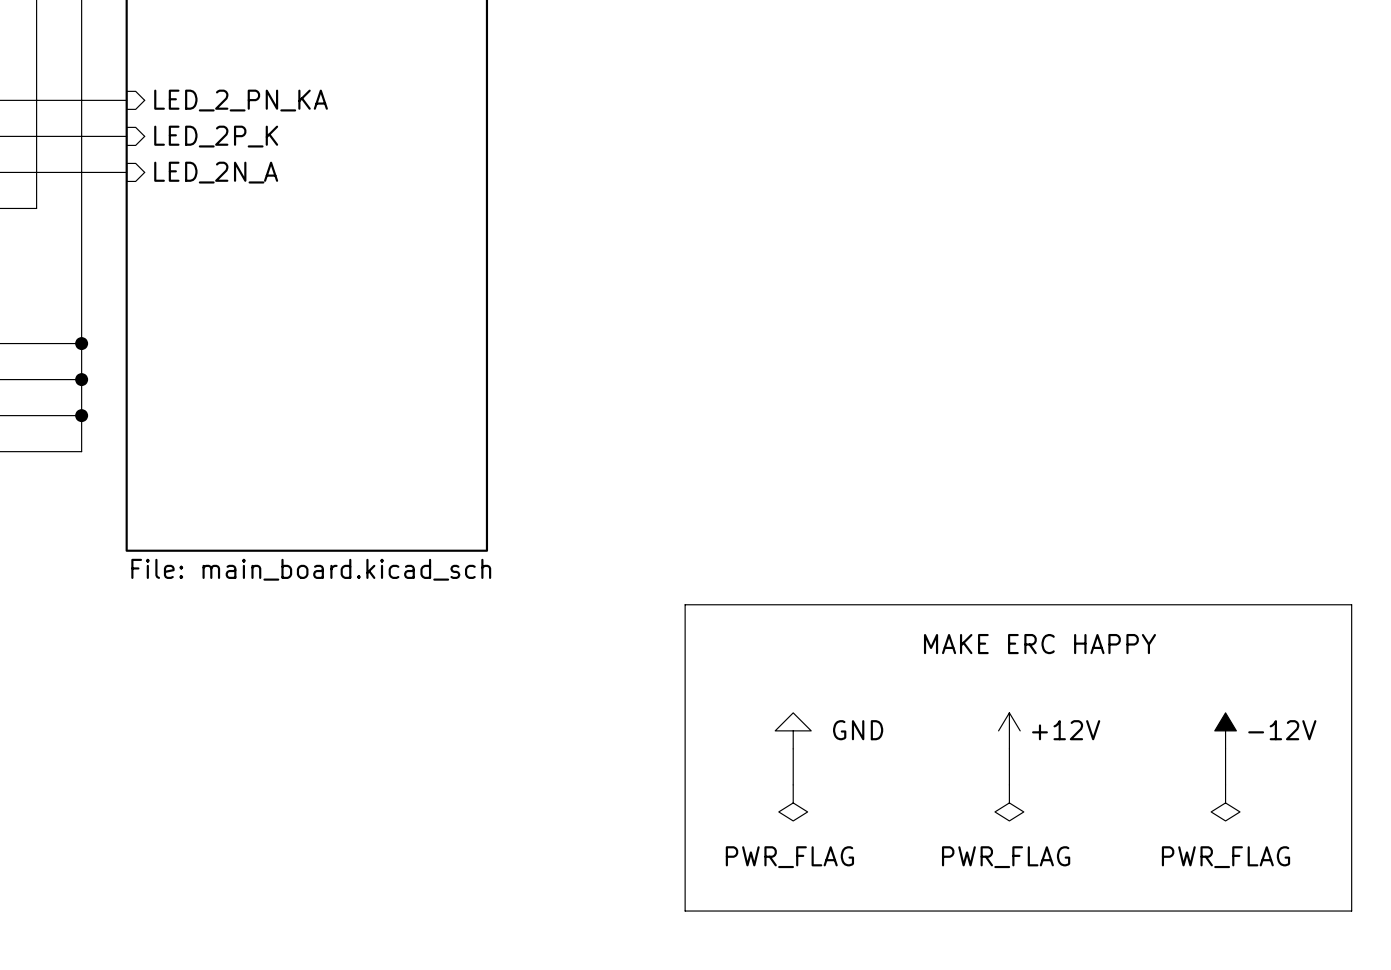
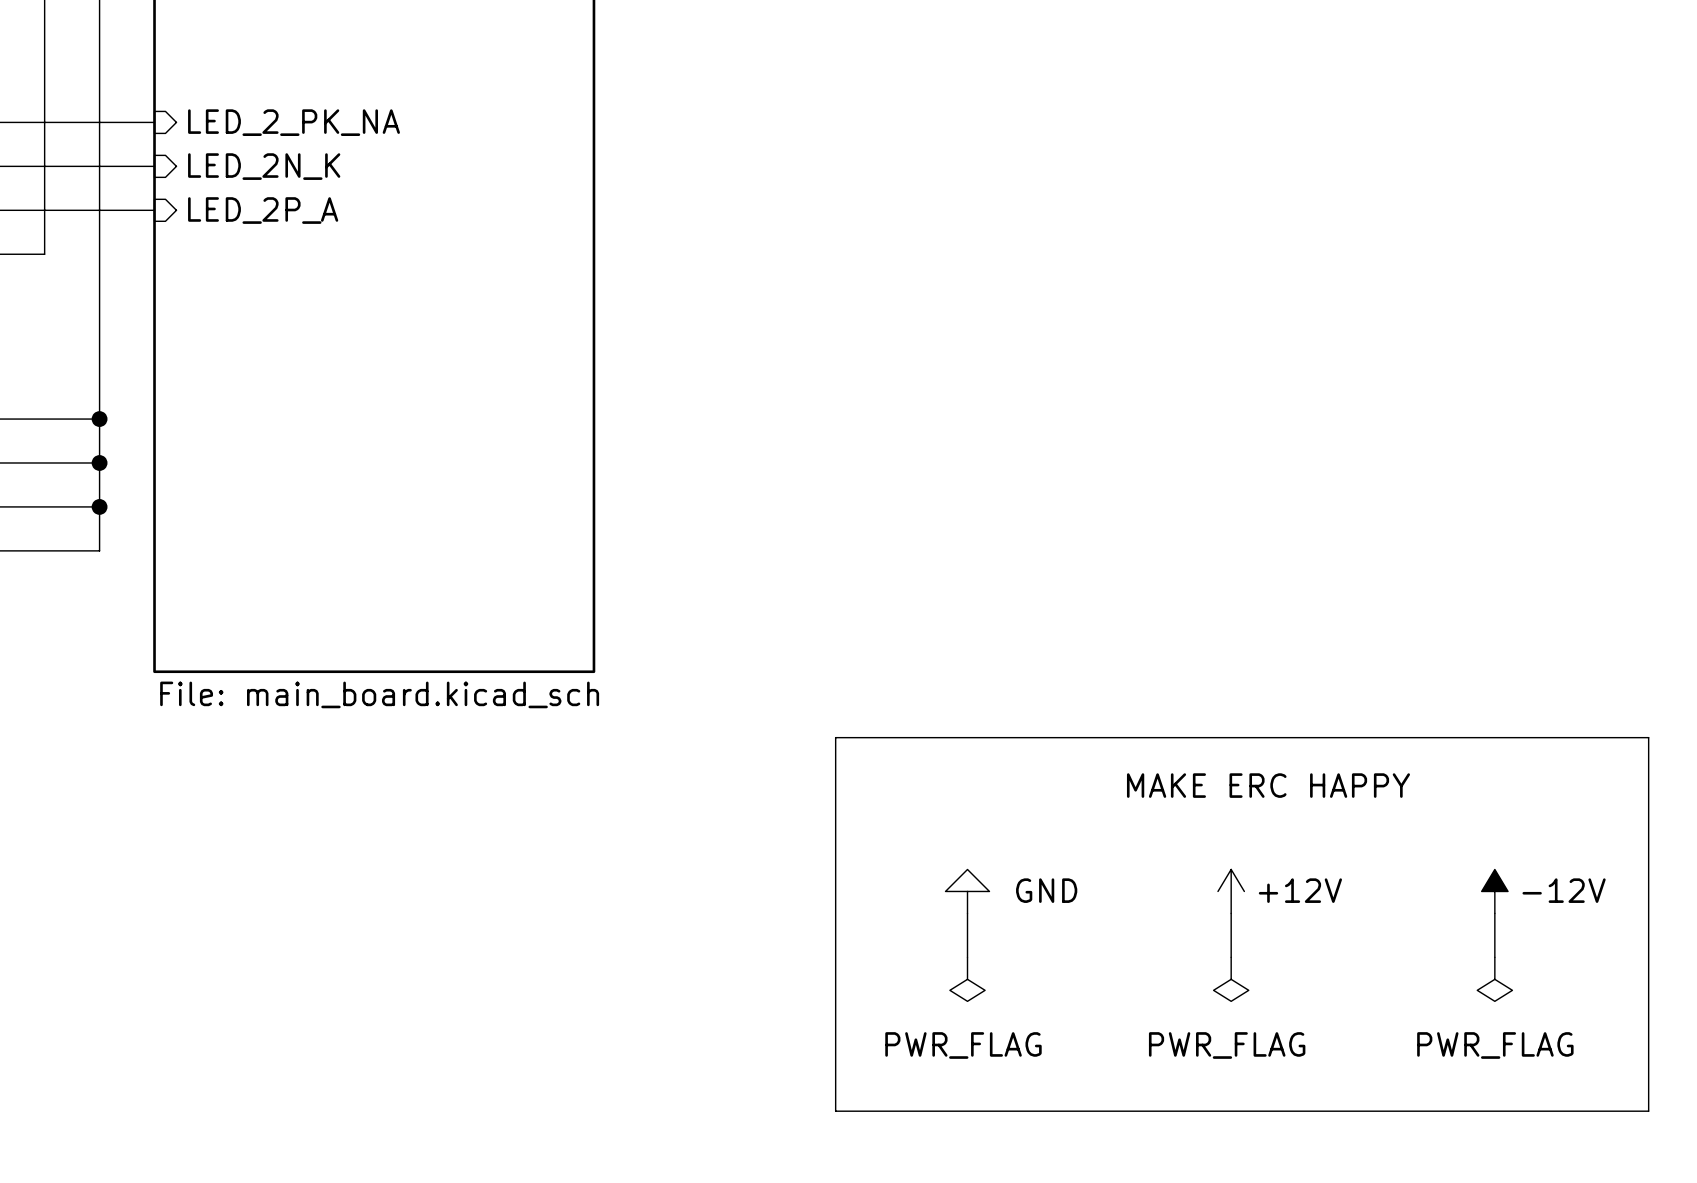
sheet pin: LED_2_PN_KA (241, 100) -> LED_2_PK_NA (294, 122)
sheet pin: LED_2P_K (216, 136) -> LED_2N_K (264, 166)
sheet pin: LED_2N_A (216, 172) -> LED_2P_A (263, 210)

